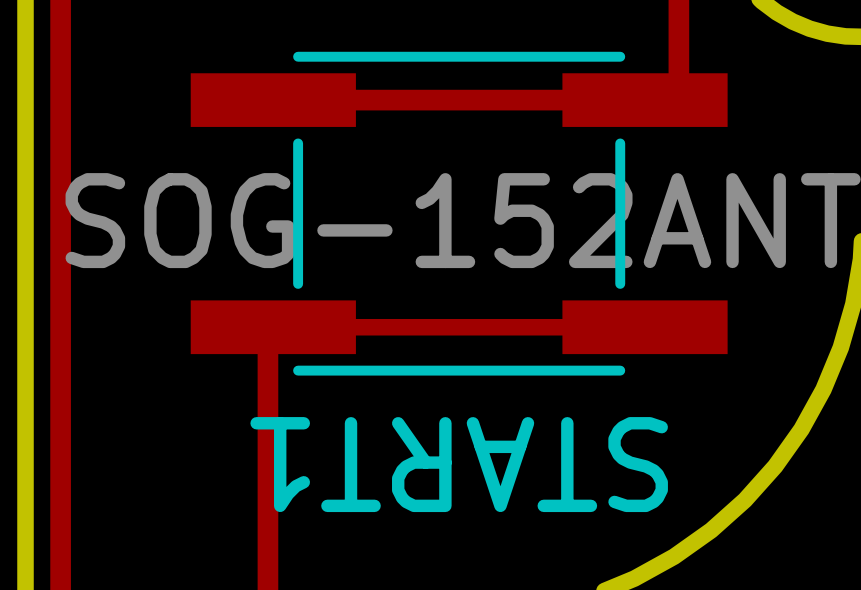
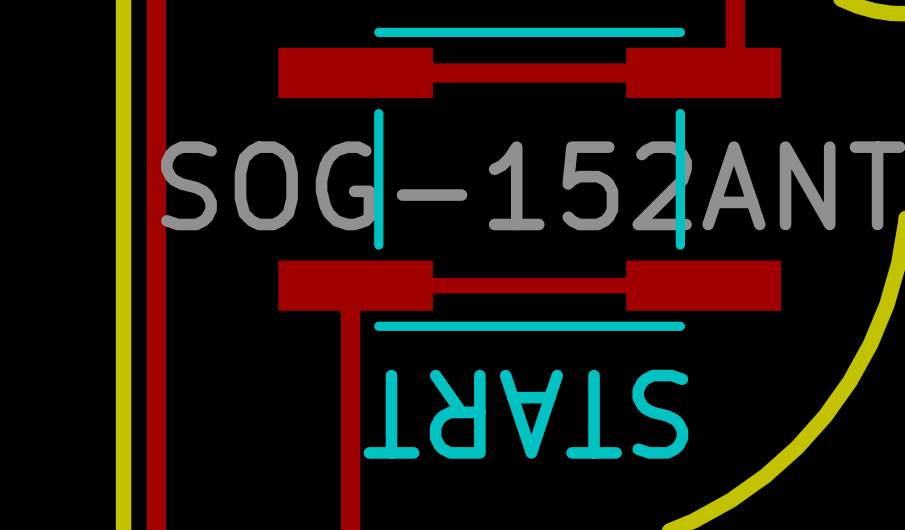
START1 name: START1 (459, 464) -> START (525, 414)

